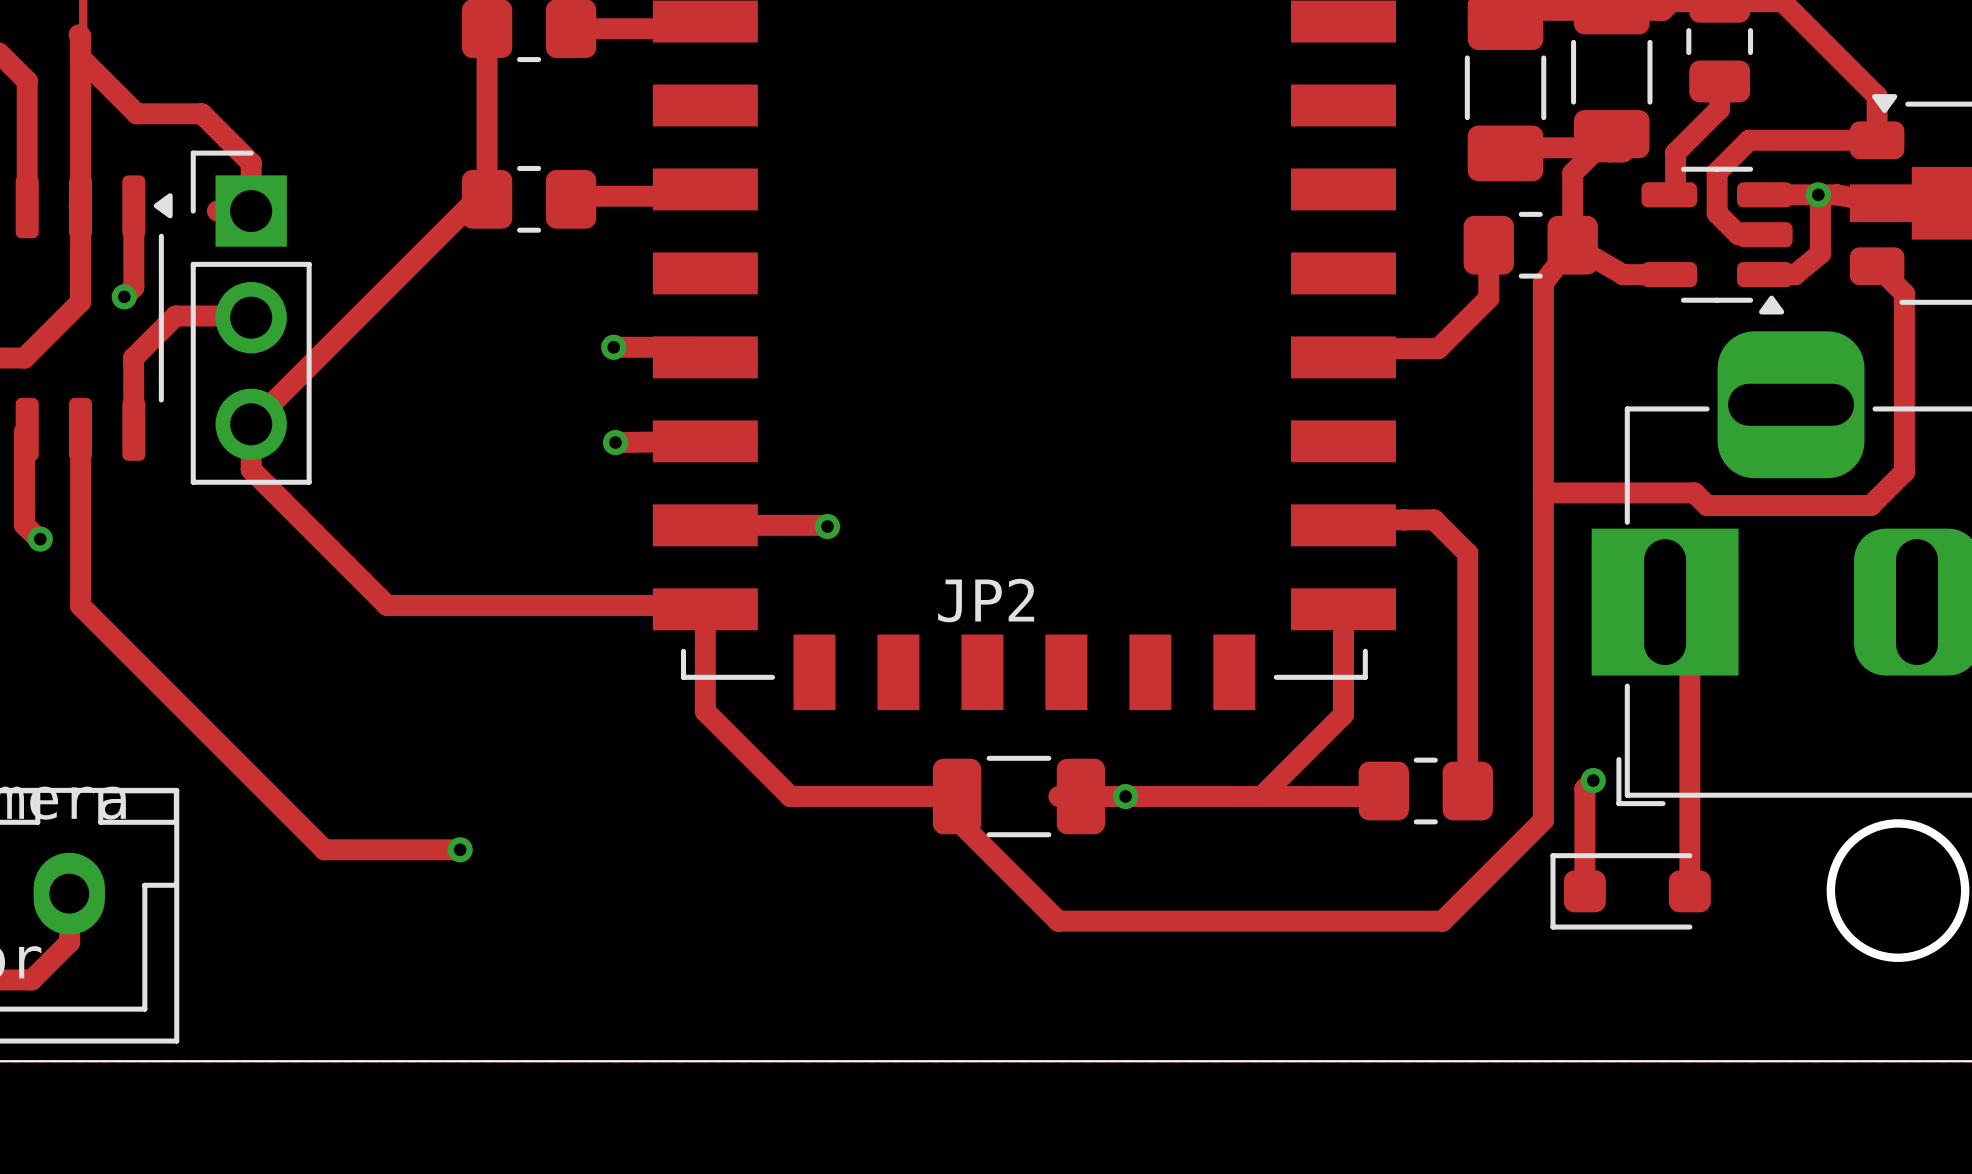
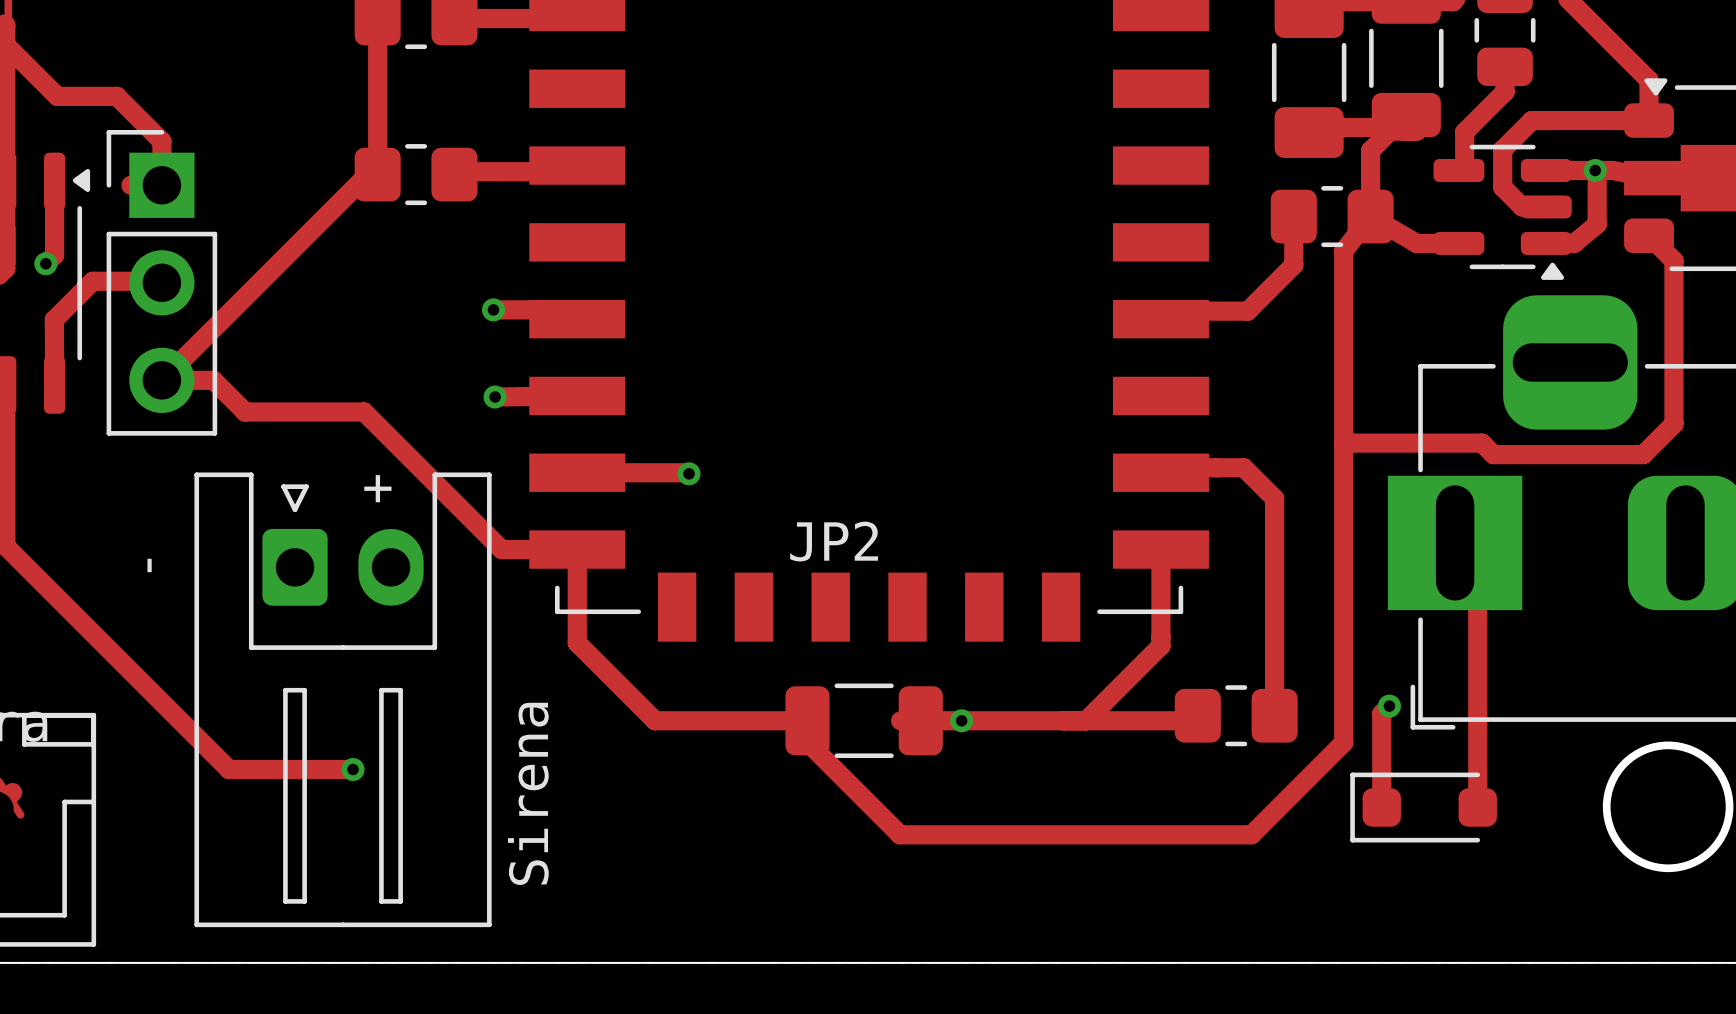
track: (251, 424) (251, 469) (387, 605) (701, 605) (705, 609) -> (161, 380) (213, 380) (245, 412) (364, 412) (501, 549) (577, 549)
text: none -> + (377, 488)
text: none -> - (149, 565)
part: none -> (343, 699)
text: none -> Sirena (528, 793)

